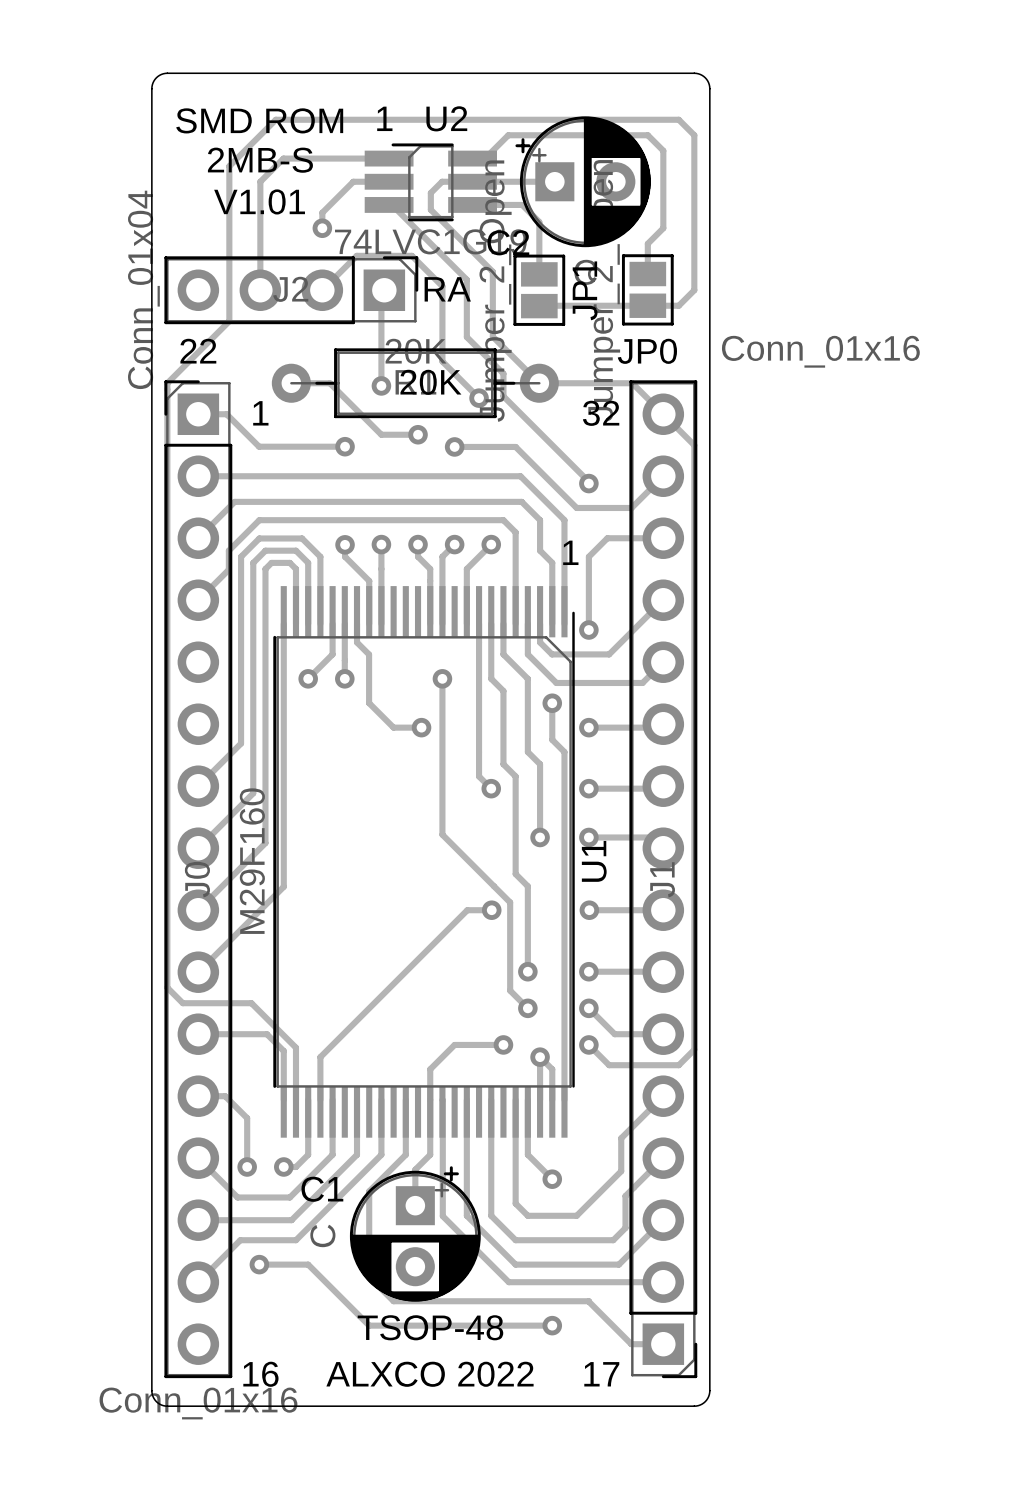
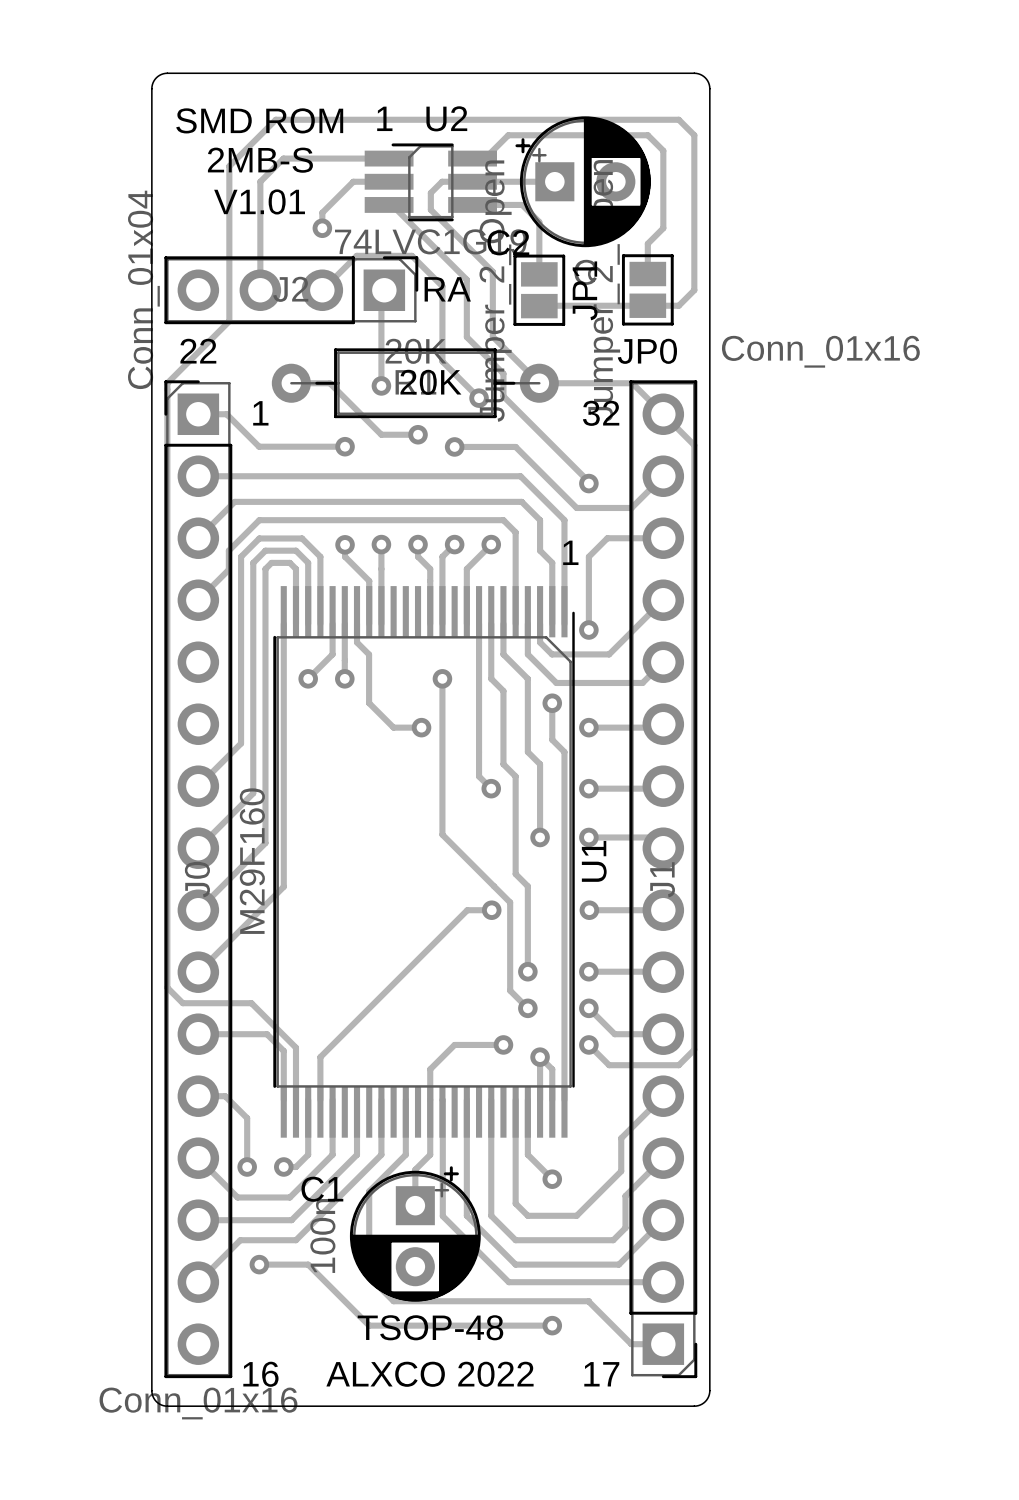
C1 value: C (322, 1235) -> 100n (322, 1235)

